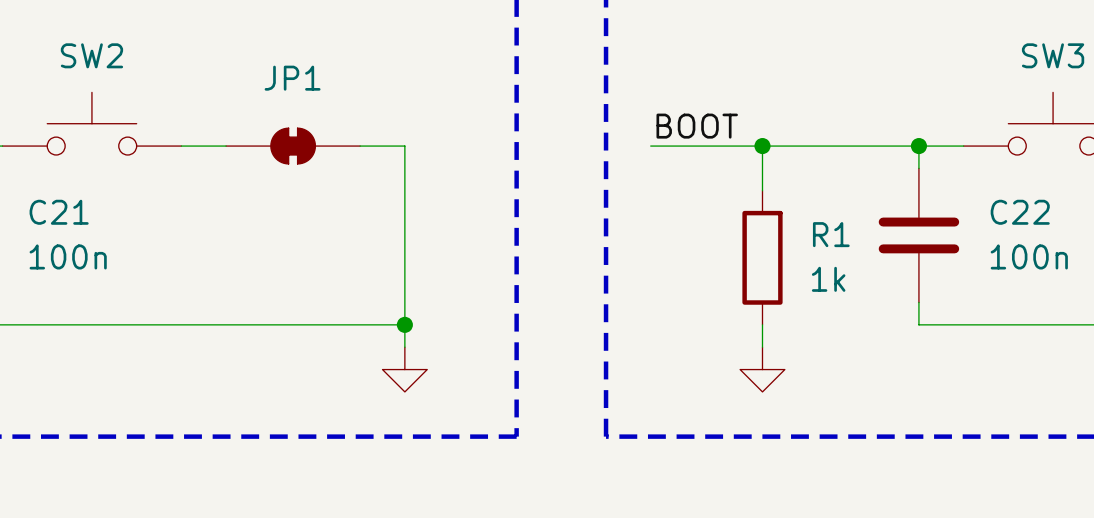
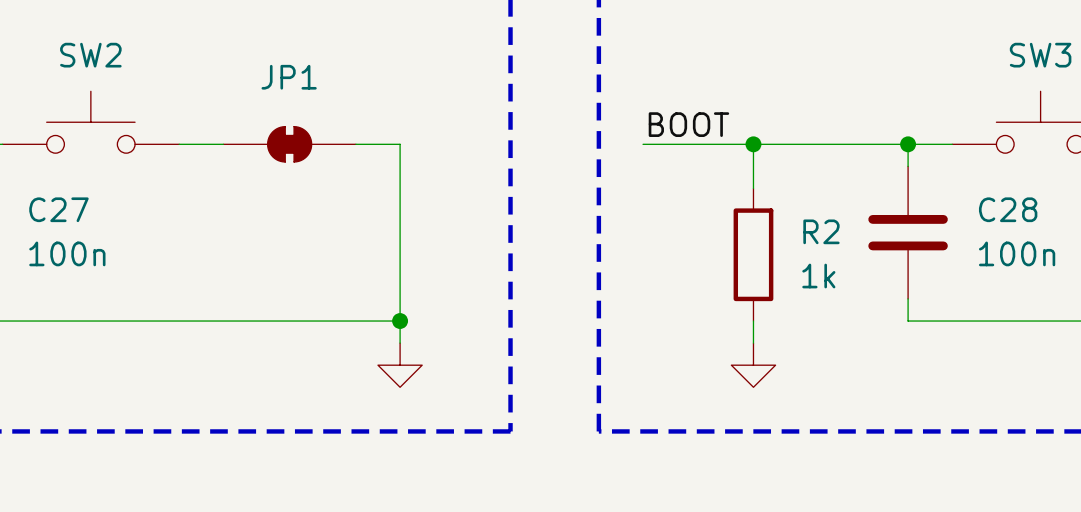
C21 name: C21 (59, 212) -> C27 (58, 209)
C22 name: C22 (1020, 212) -> C28 (1008, 209)
R1 name: R1 (831, 234) -> R2 (821, 231)

